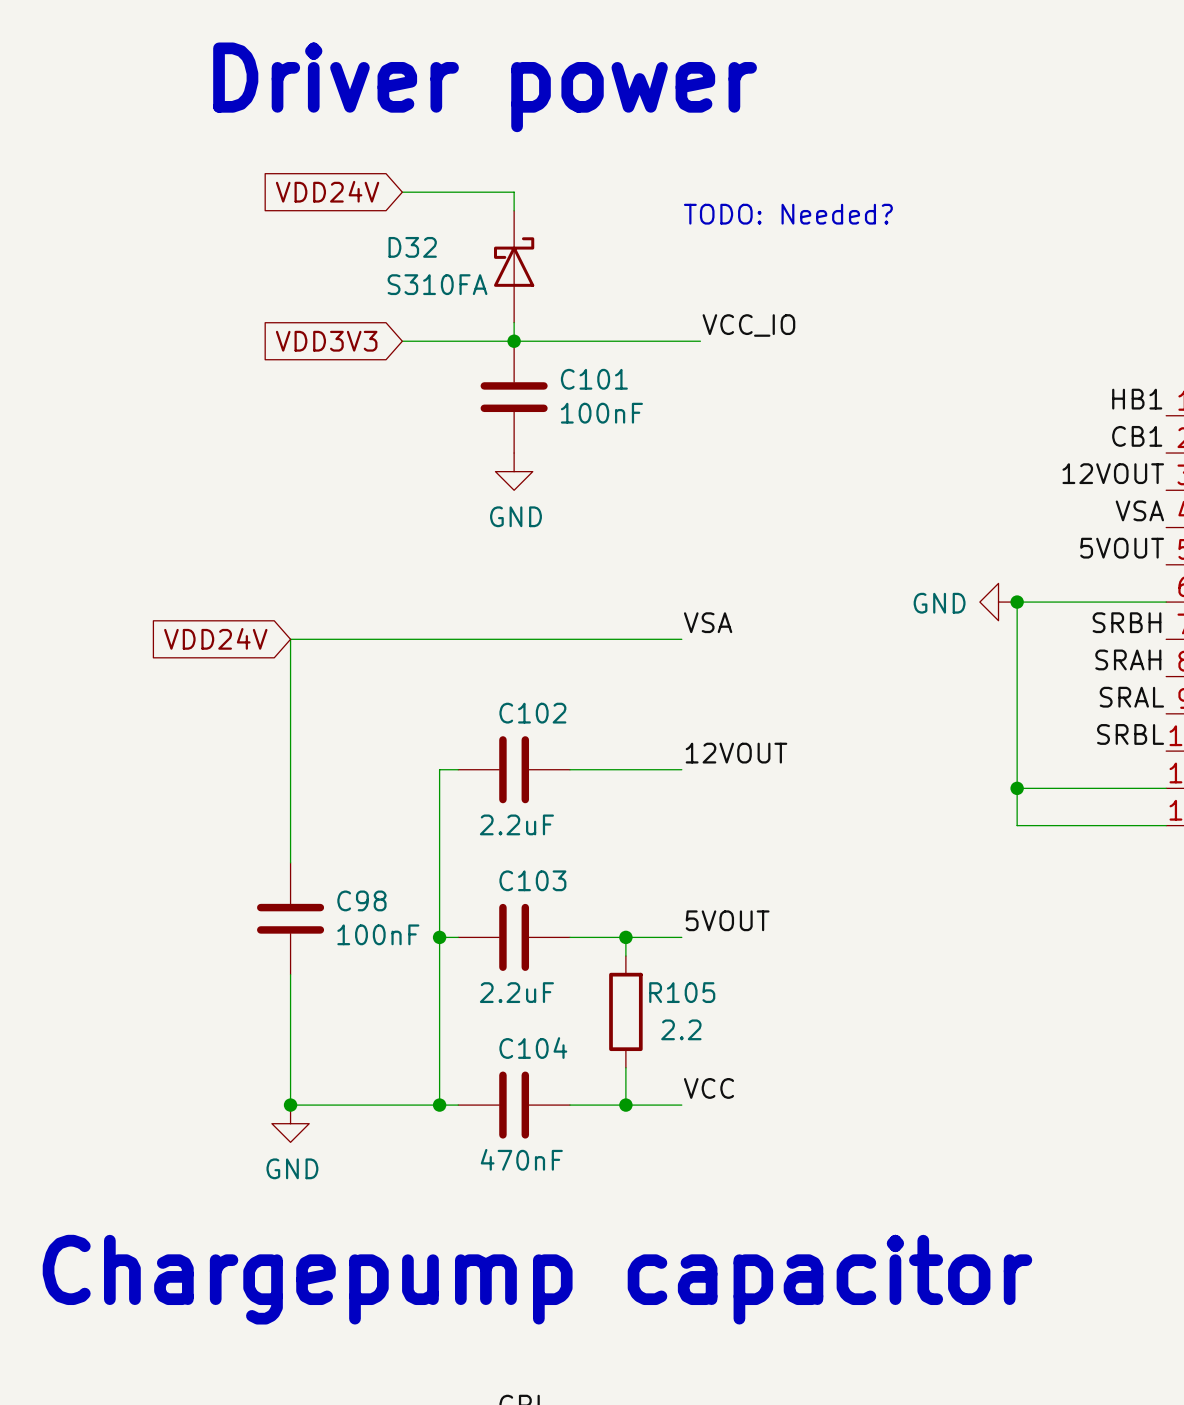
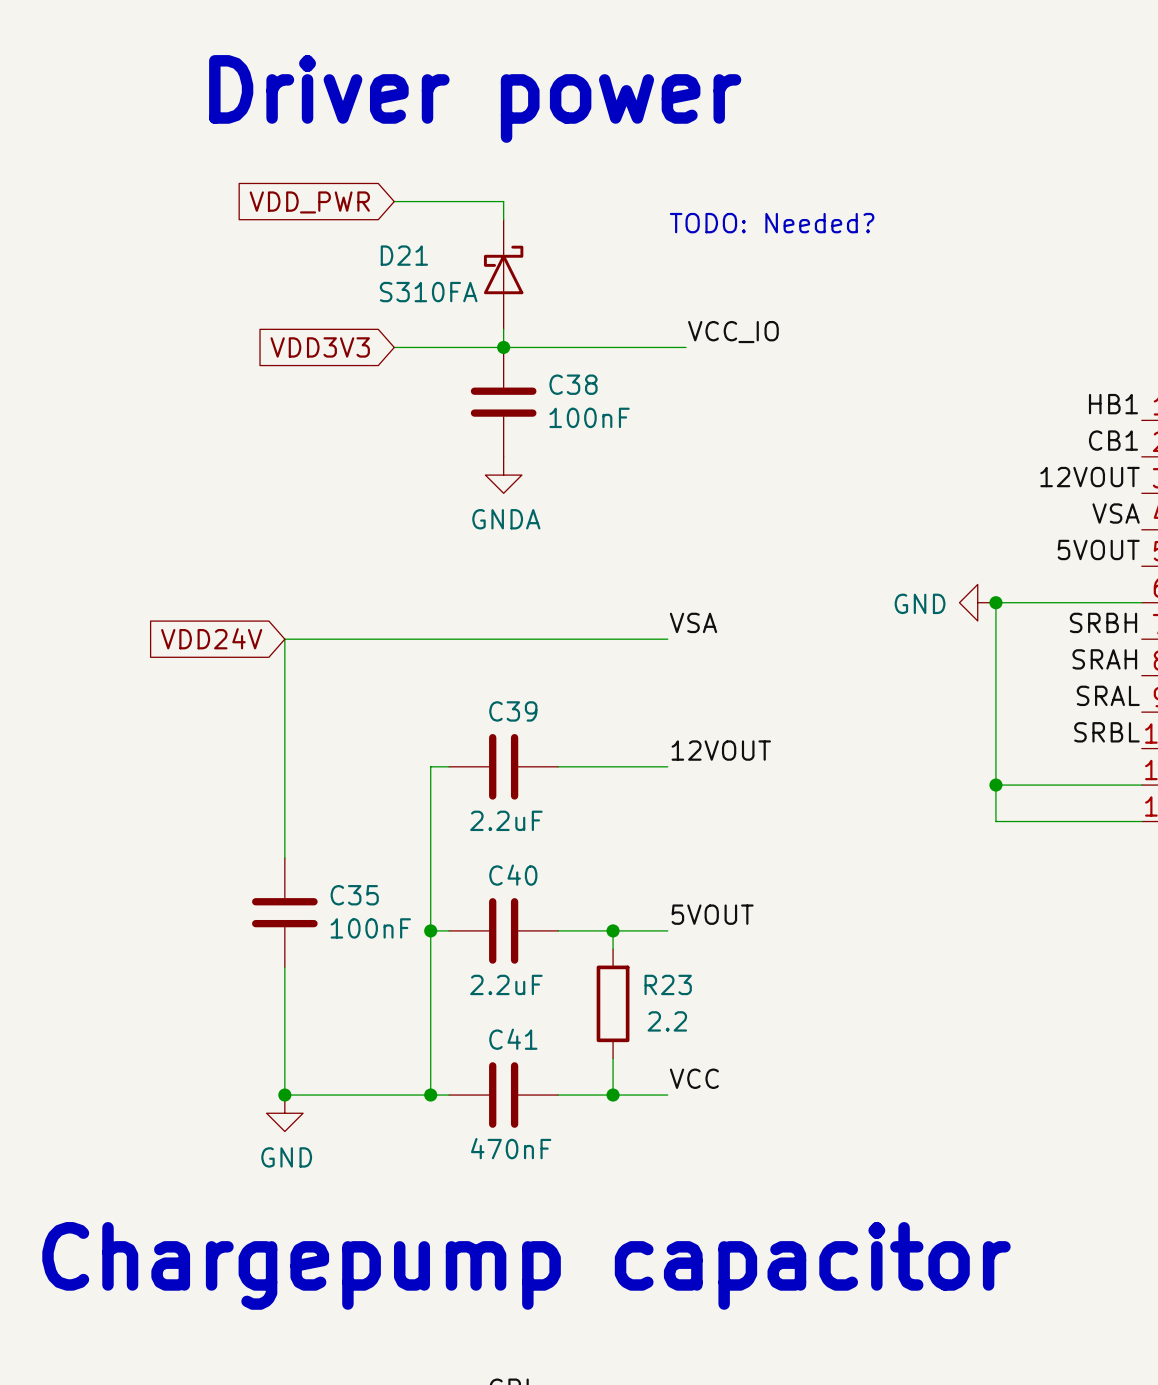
global label: VDD24V (327, 191) -> VDD_PWR (309, 202)
D32 name: D32 (412, 247) -> D21 (404, 255)
C101 name: C101 (594, 379) -> C38 (573, 384)
power symbol: GND (514, 471) -> GNDA (503, 475)
C102 name: C102 (532, 713) -> C39 (513, 711)
C103 name: C103 (532, 880) -> C40 (513, 875)
C98 name: C98 (361, 900) -> C35 (354, 895)
R105 name: R105 (682, 992) -> R23 (668, 984)
C104 name: C104 (533, 1048) -> C41 (513, 1039)

